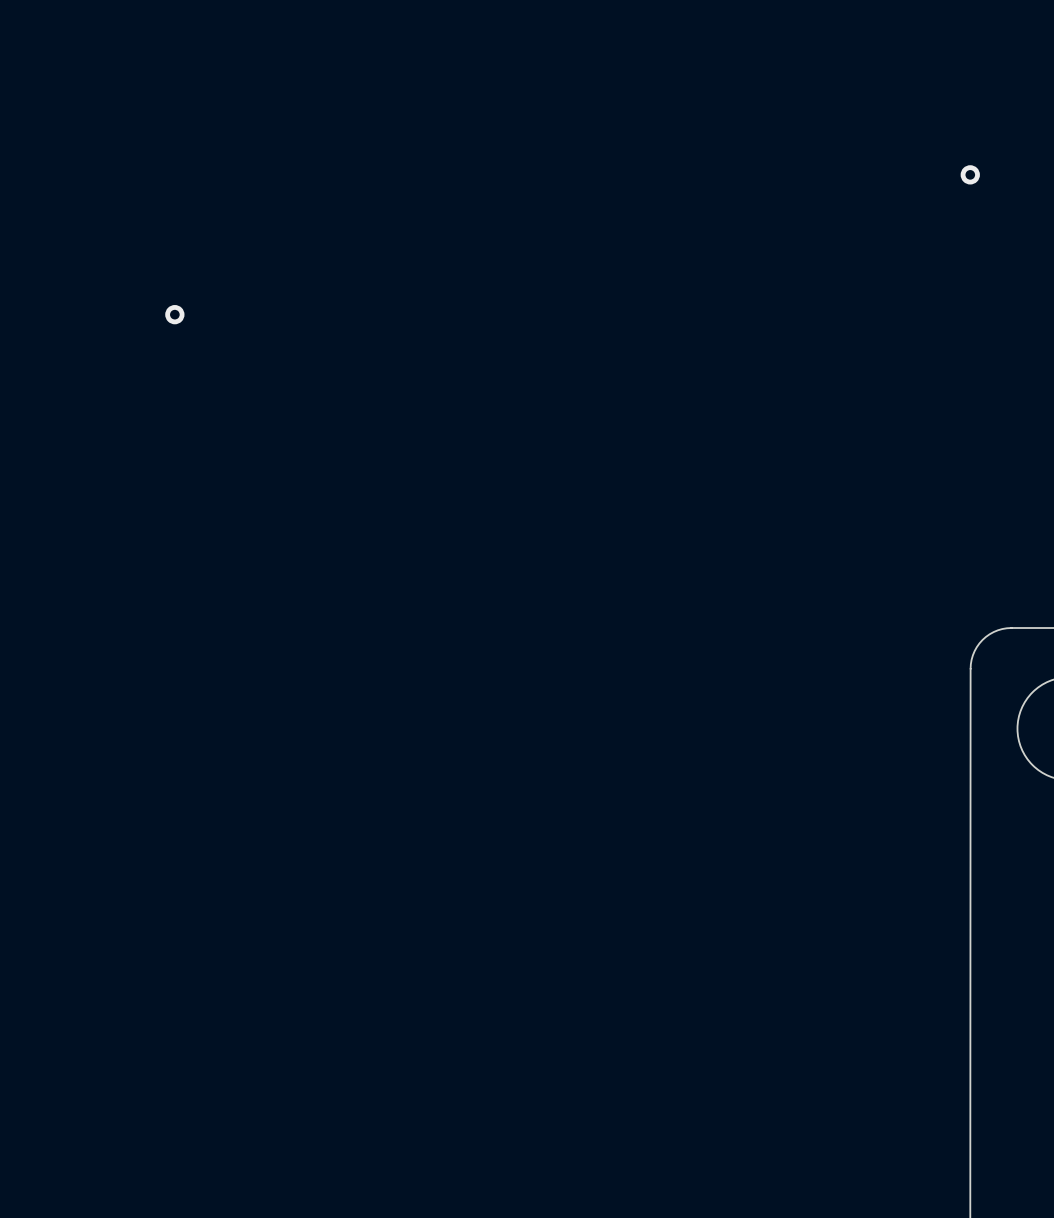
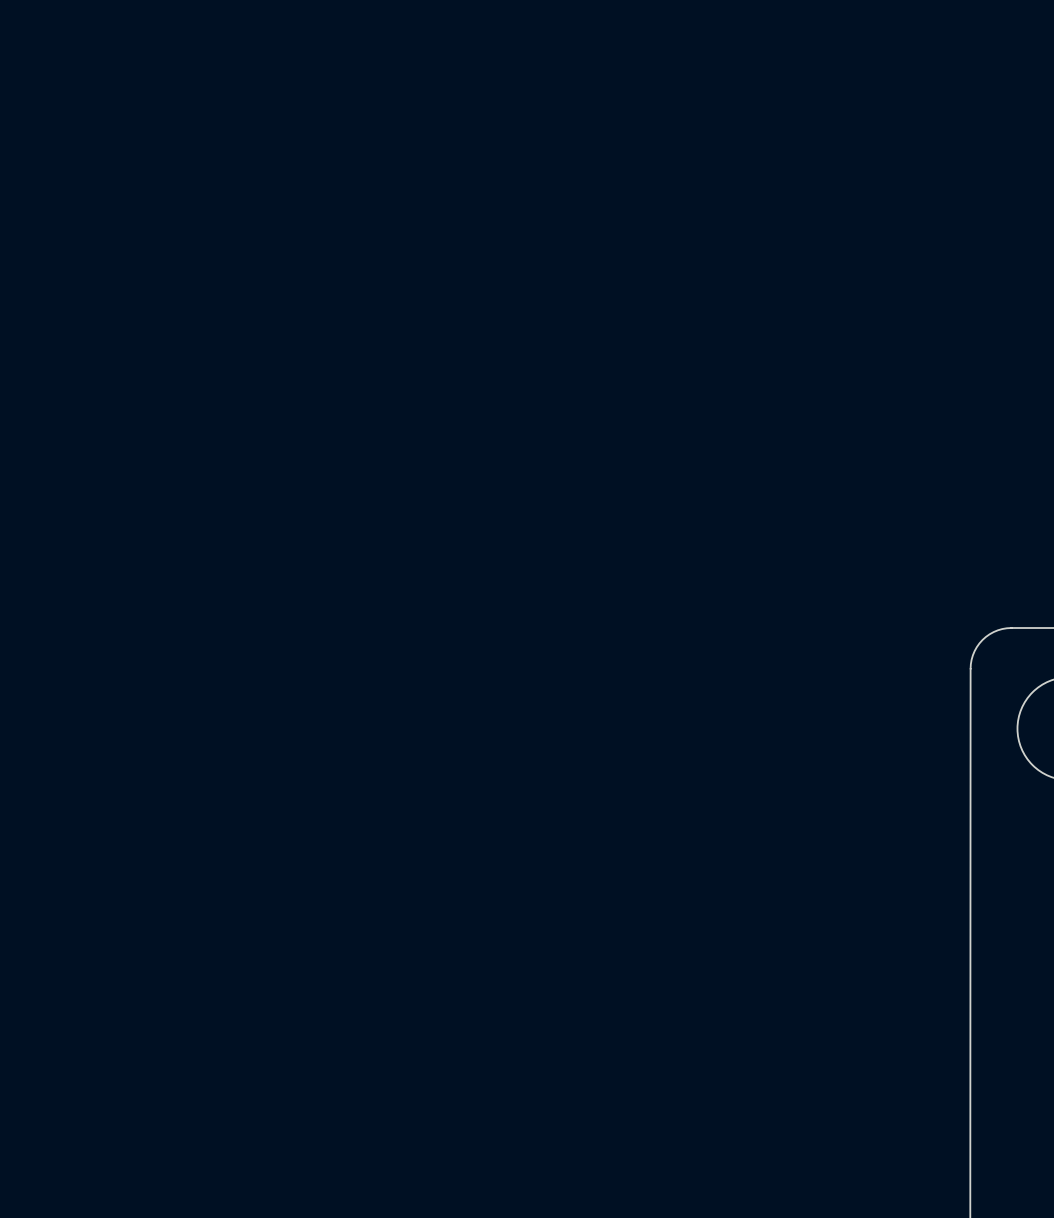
via: (970, 174) -> none
via: (174, 314) -> none

